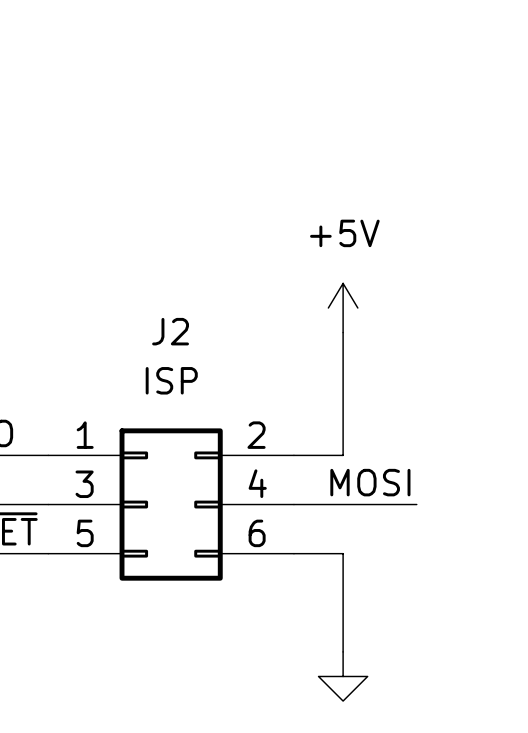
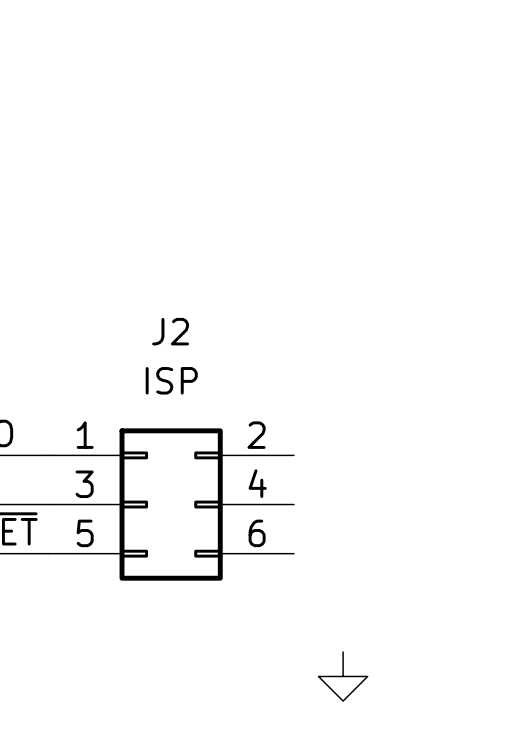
power symbol: +5V (343, 308) -> none
wire: (343, 332) (343, 455) (293, 455) -> none
label: MOSI (370, 482) -> none
wire: (293, 504) (416, 504) -> none
wire: (293, 553) (343, 553) (343, 651) -> none

